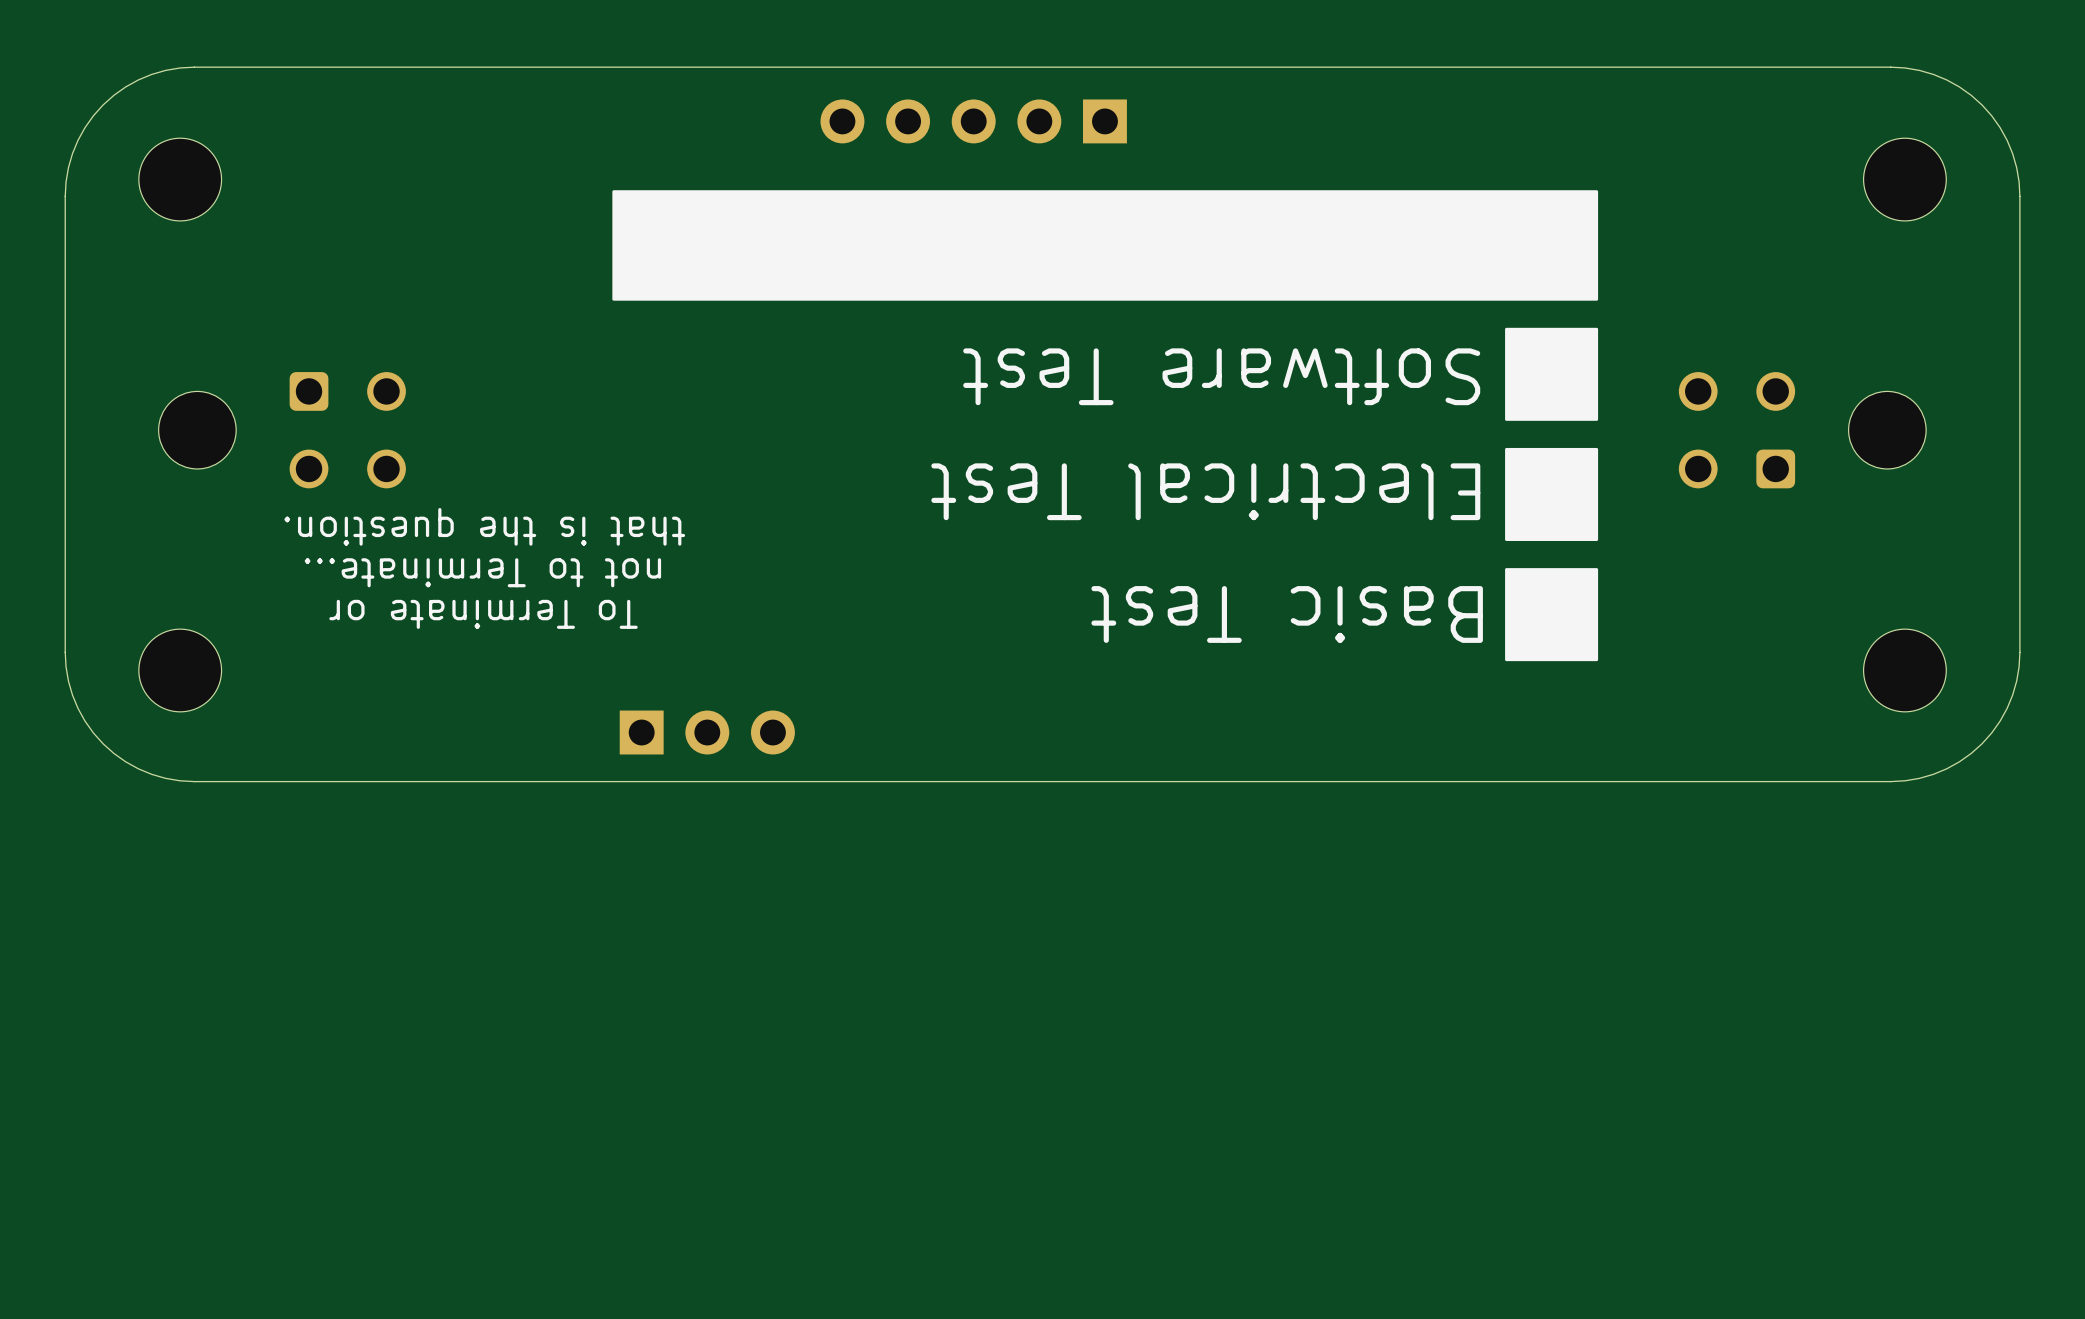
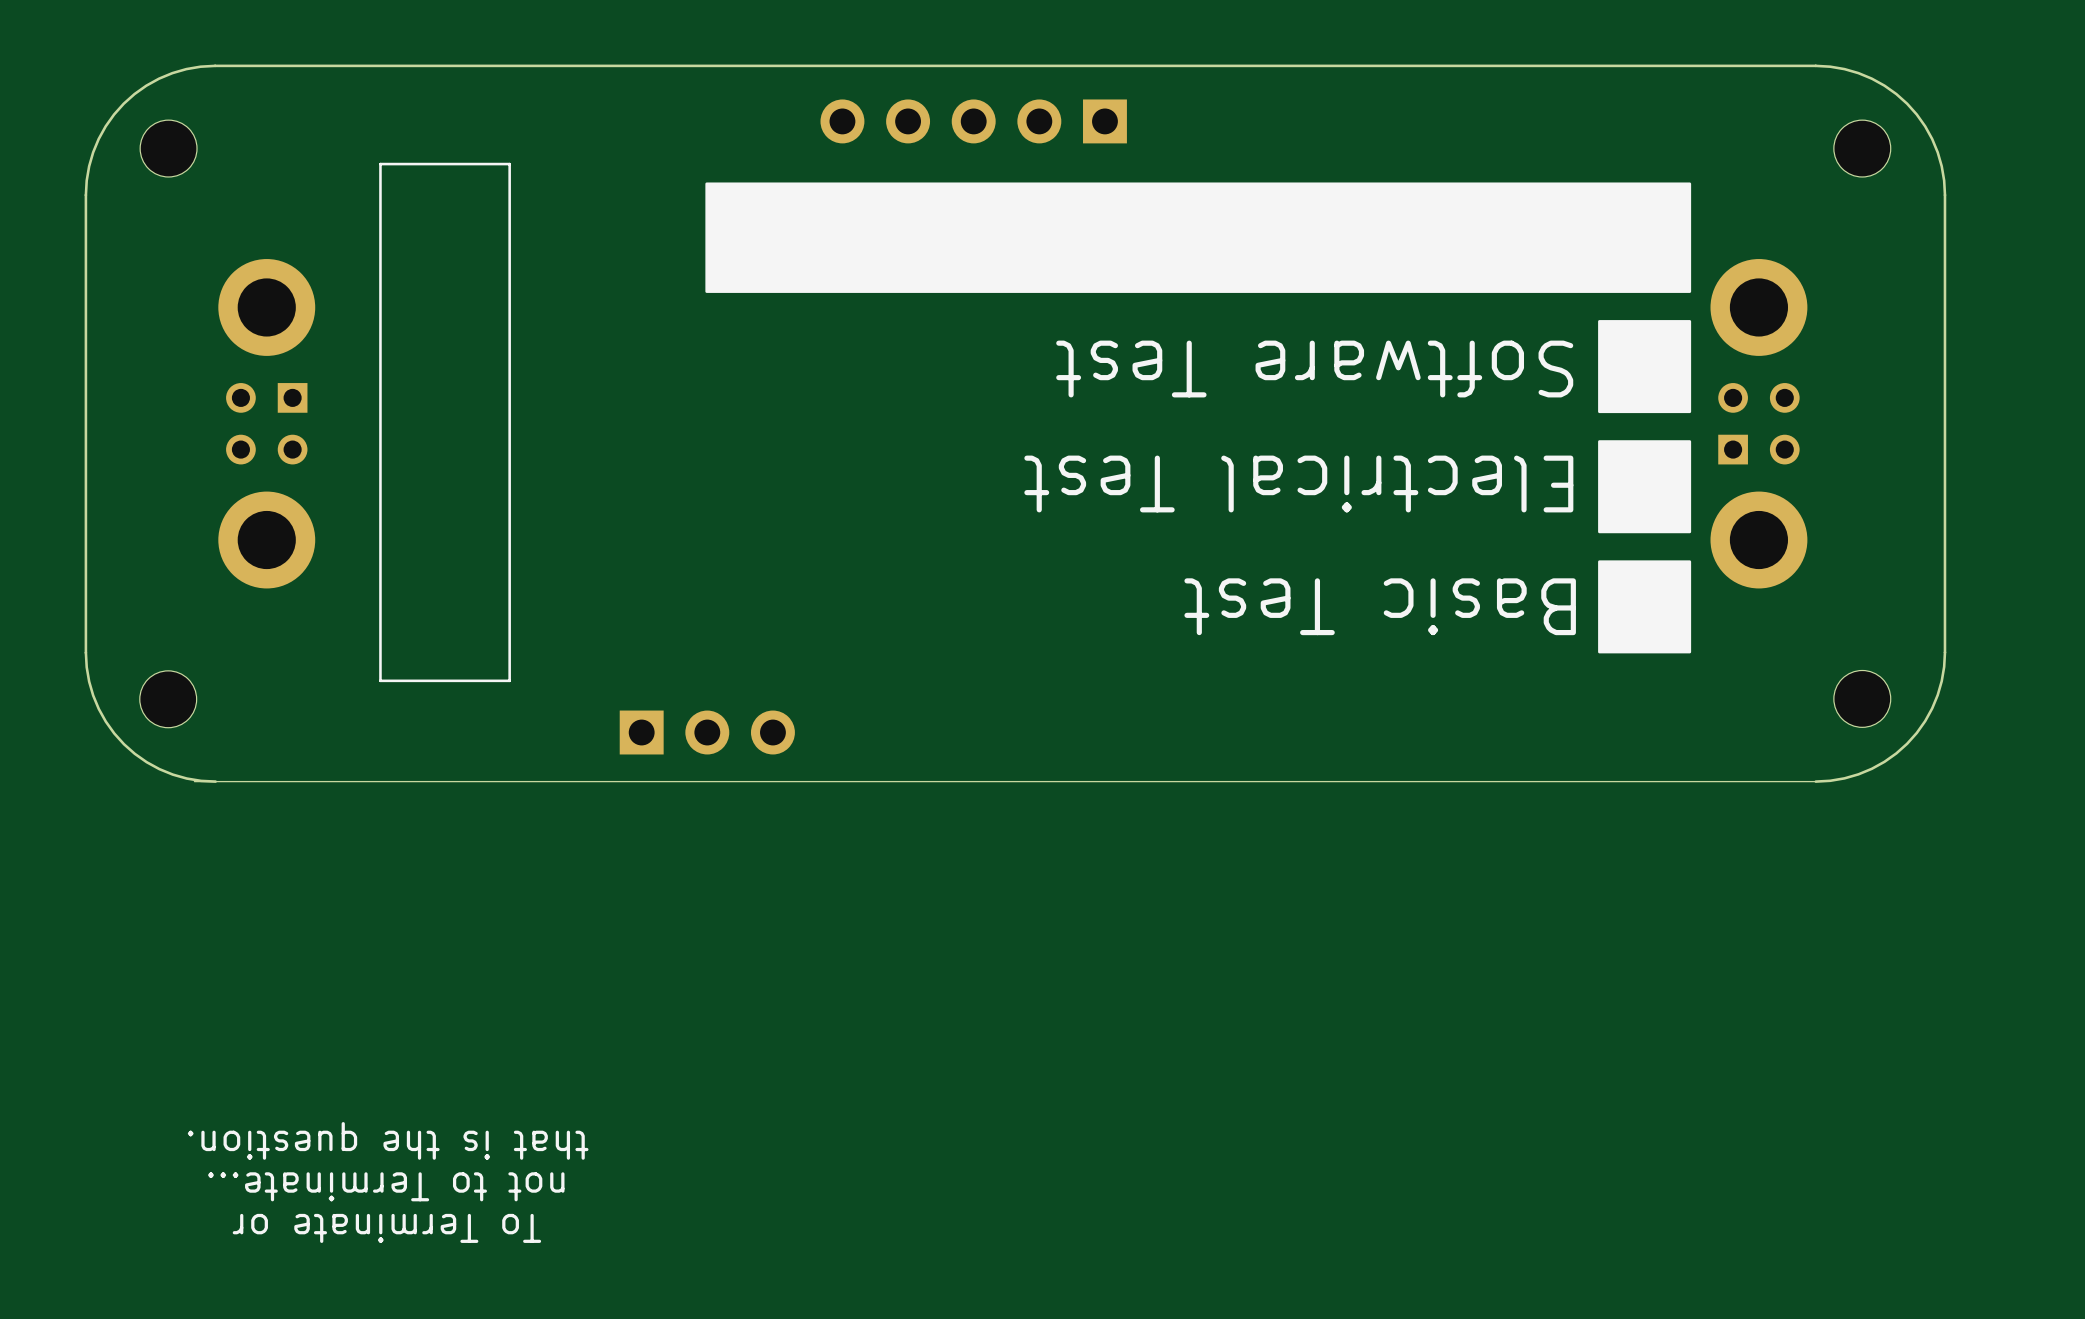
part: none -> (168, 148)
part: none -> (1862, 148)
line: none -> (509, 164) (380, 164) (380, 680) (509, 680) (509, 164)
part: (180, 179) -> none
part: (1904, 179) -> none
part footprint: [158, 372, 406, 489] -> [218, 259, 316, 589]
part: none -> (1758, 423)
drawing position: (1105, 425) -> (1198, 417)
part: (1802, 430) -> none
text position: that is the question. (484, 526) -> that is the question. (388, 1140)
text position: not to Terminate... (482, 572) -> not to Terminate... (386, 1186)
text position: To Terminate or (483, 614) -> To Terminate or (386, 1228)
part: (180, 670) -> none
part: (1904, 670) -> none
part: none -> (1862, 698)
part: none -> (168, 699)
board edge: (1815, 781) (1905, 780) (1933, 774) (1959, 761) (1982, 743) (2000, 721) (2012, 695) (2019, 666) (2019, 196) (2016, 167) (2012, 153) (2000, 127) (1991, 115) (1971, 95) (1959, 86) (1933, 74) (1905, 67) (194, 67) (165, 70) (138, 79) (113, 95) (93, 115) (85, 127) (72, 153) (66, 181) (66, 666) (68, 681) (78, 708) (85, 721) (103, 743) (125, 761) (138, 768) (165, 778) (194, 781) -> (1815, 781) (1844, 778) (1858, 774) (1884, 761) (1907, 743) (1916, 732) (1932, 708) (1941, 681) (1944, 666) (1944, 180) (1937, 152) (1932, 139) (1916, 114) (1896, 94) (1871, 78) (1844, 69) (1815, 65) (215, 65) (186, 69) (172, 73) (146, 85) (134, 94) (114, 114) (105, 126) (93, 152) (89, 166) (85, 195) (85, 652) (89, 681) (93, 695) (105, 721) (123, 744) (146, 762) (172, 774) (201, 780) (215, 781)

